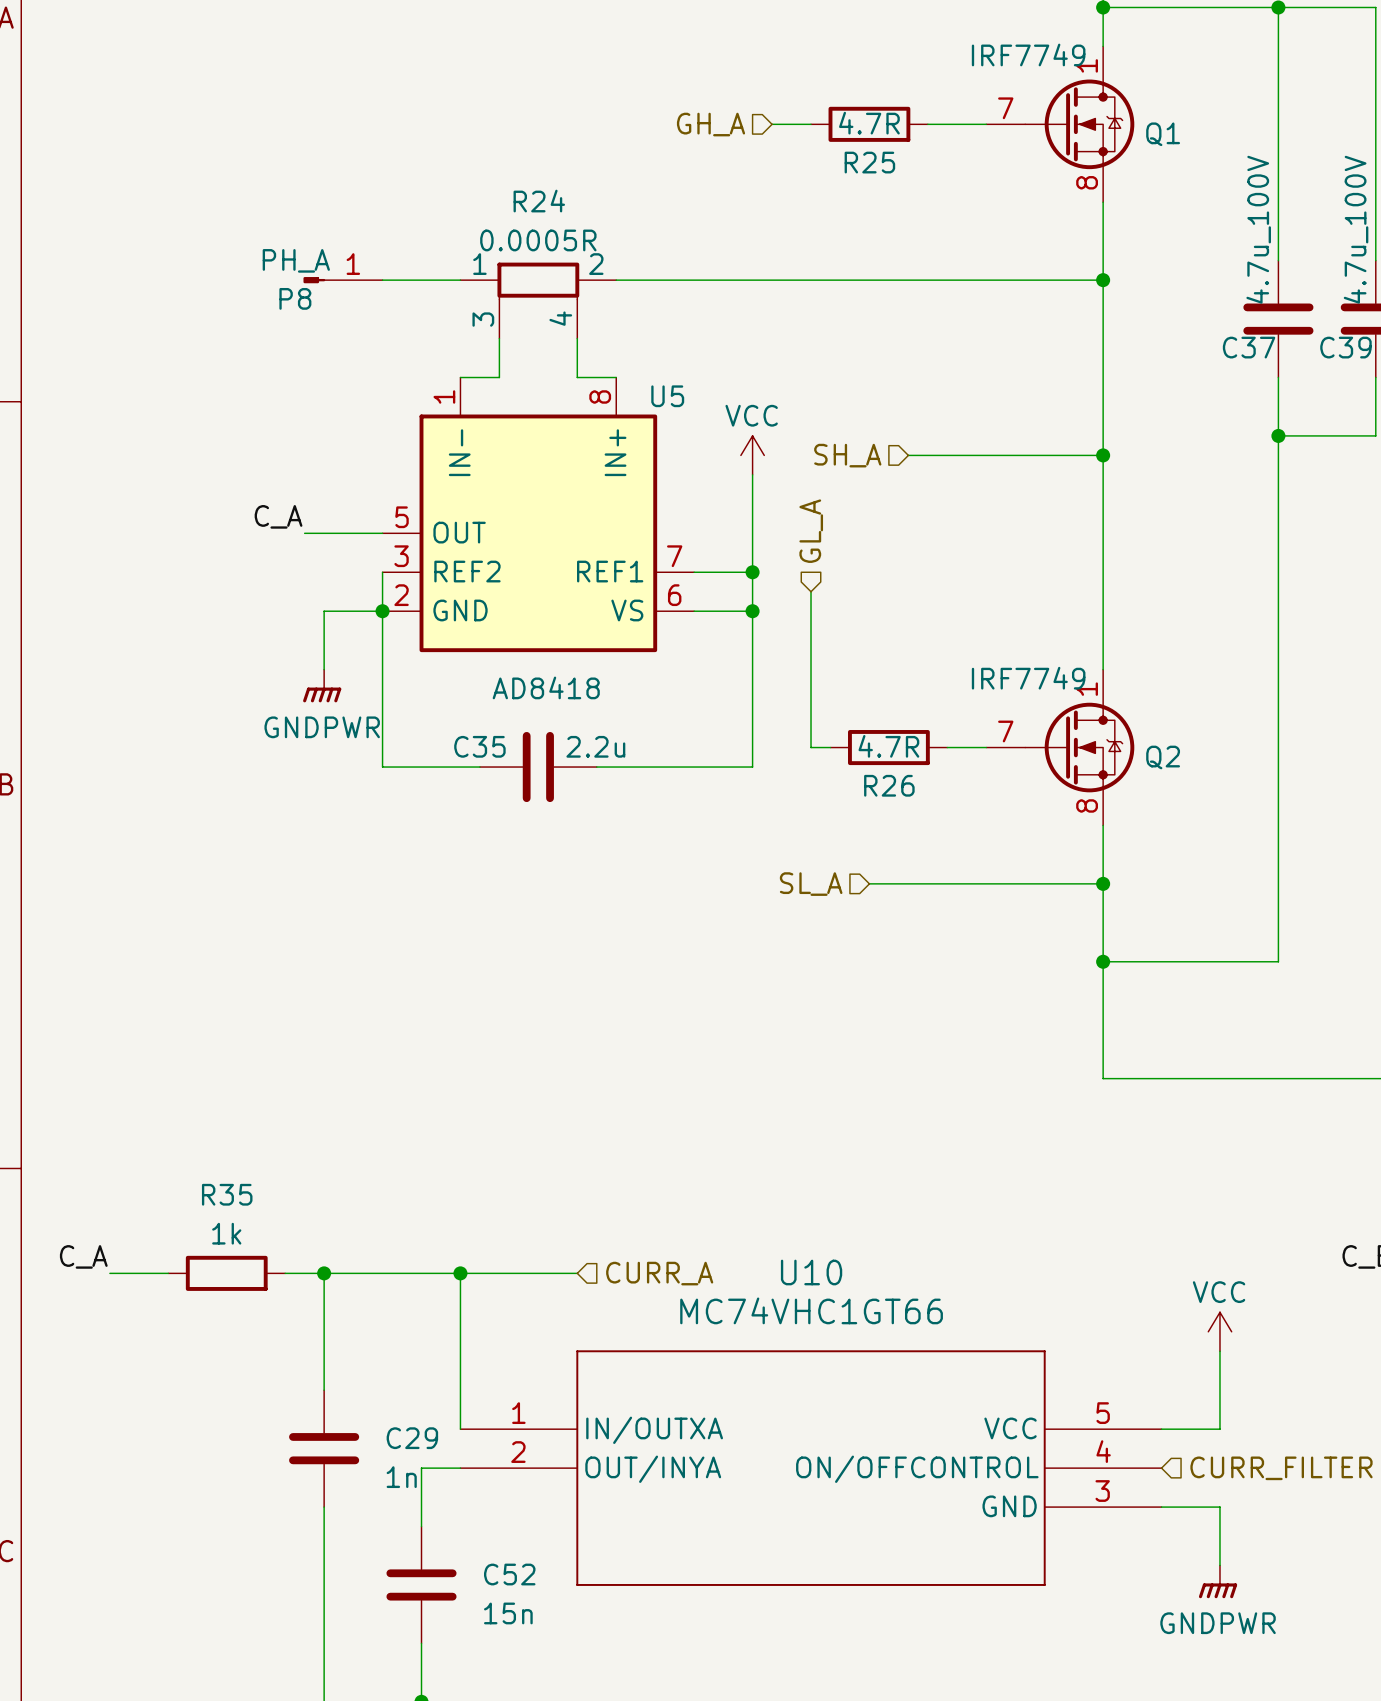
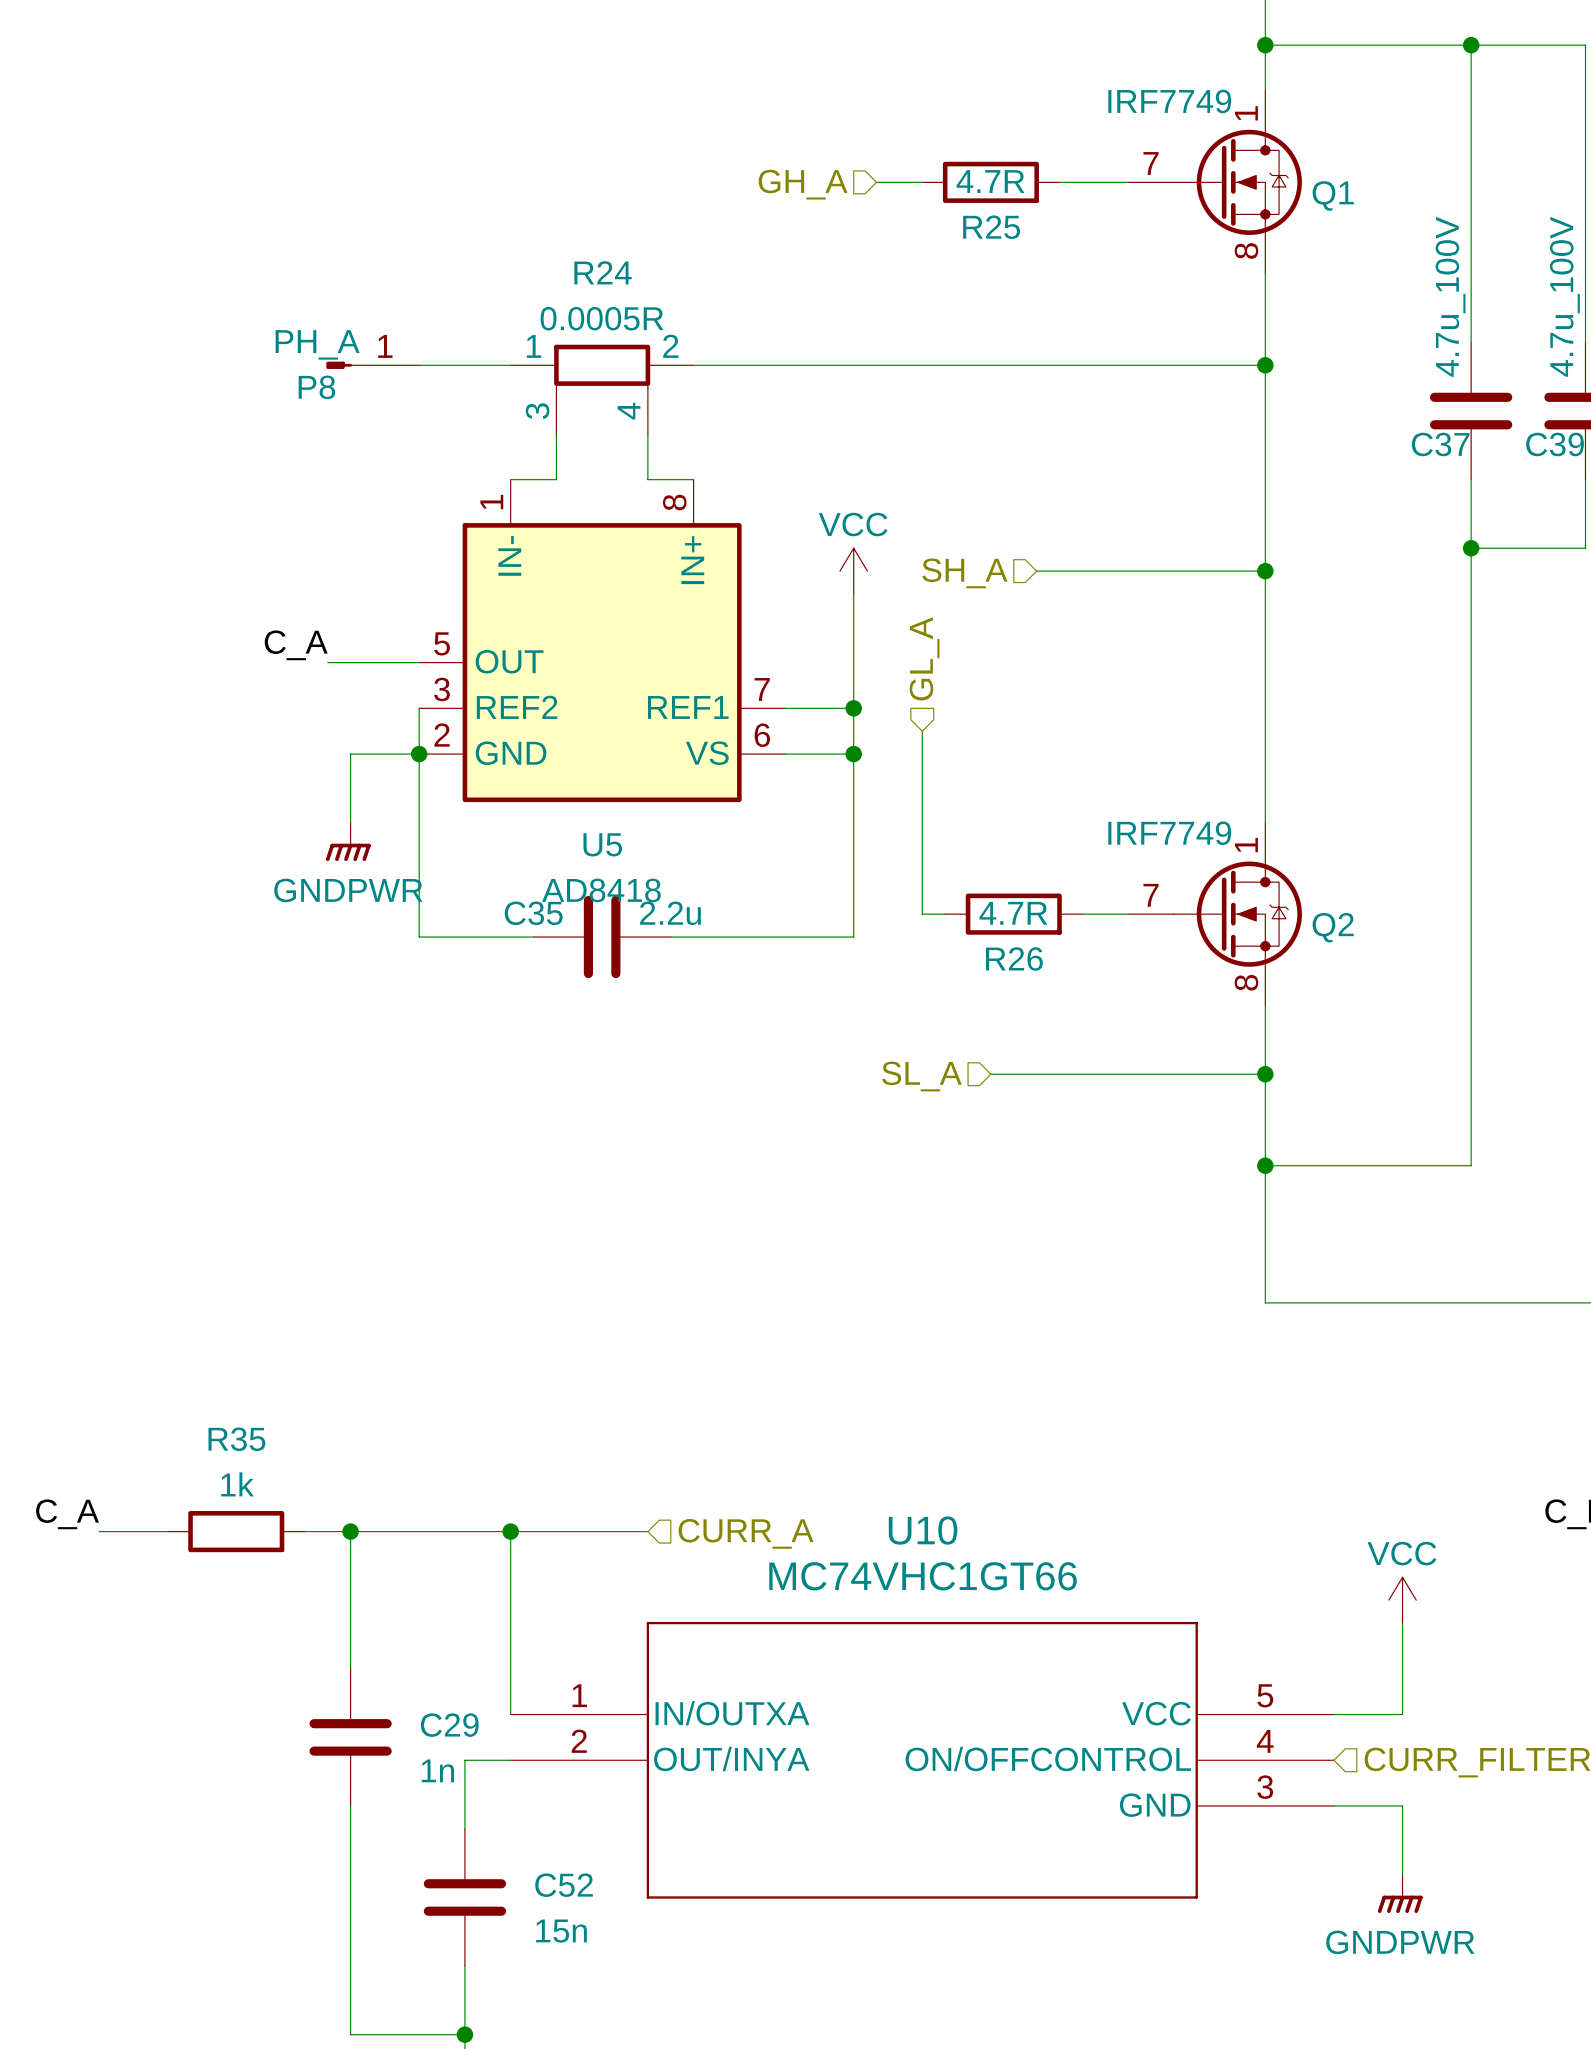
U5 name position: U5 (667, 396) -> U5 (602, 844)
U5 value position: AD8418 (546, 687) -> AD8418 (601, 890)

